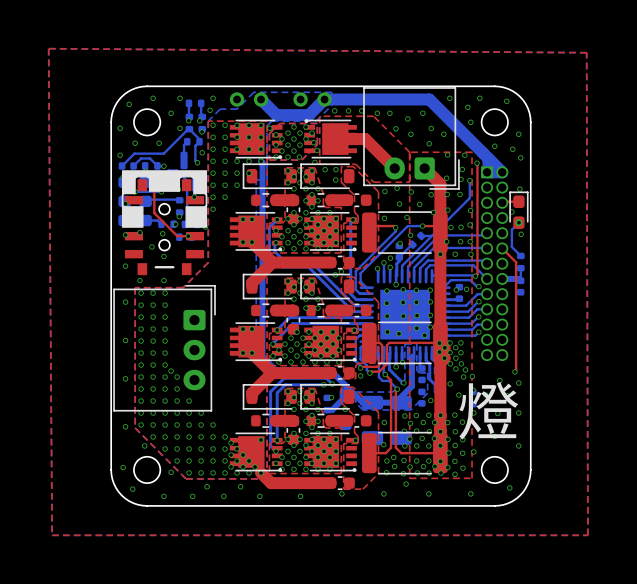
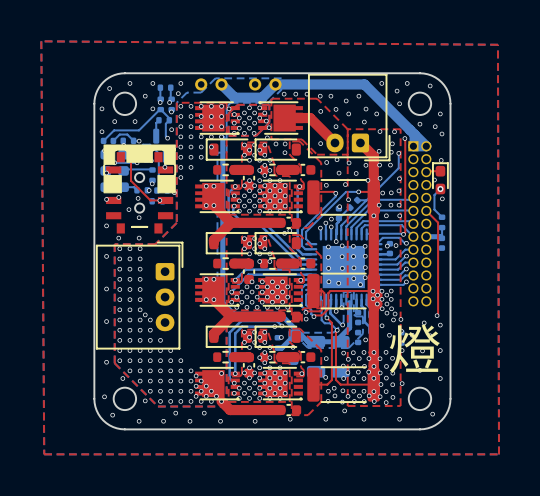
via: none -> (320, 111)
via: none -> (336, 126)
via: none -> (320, 143)

